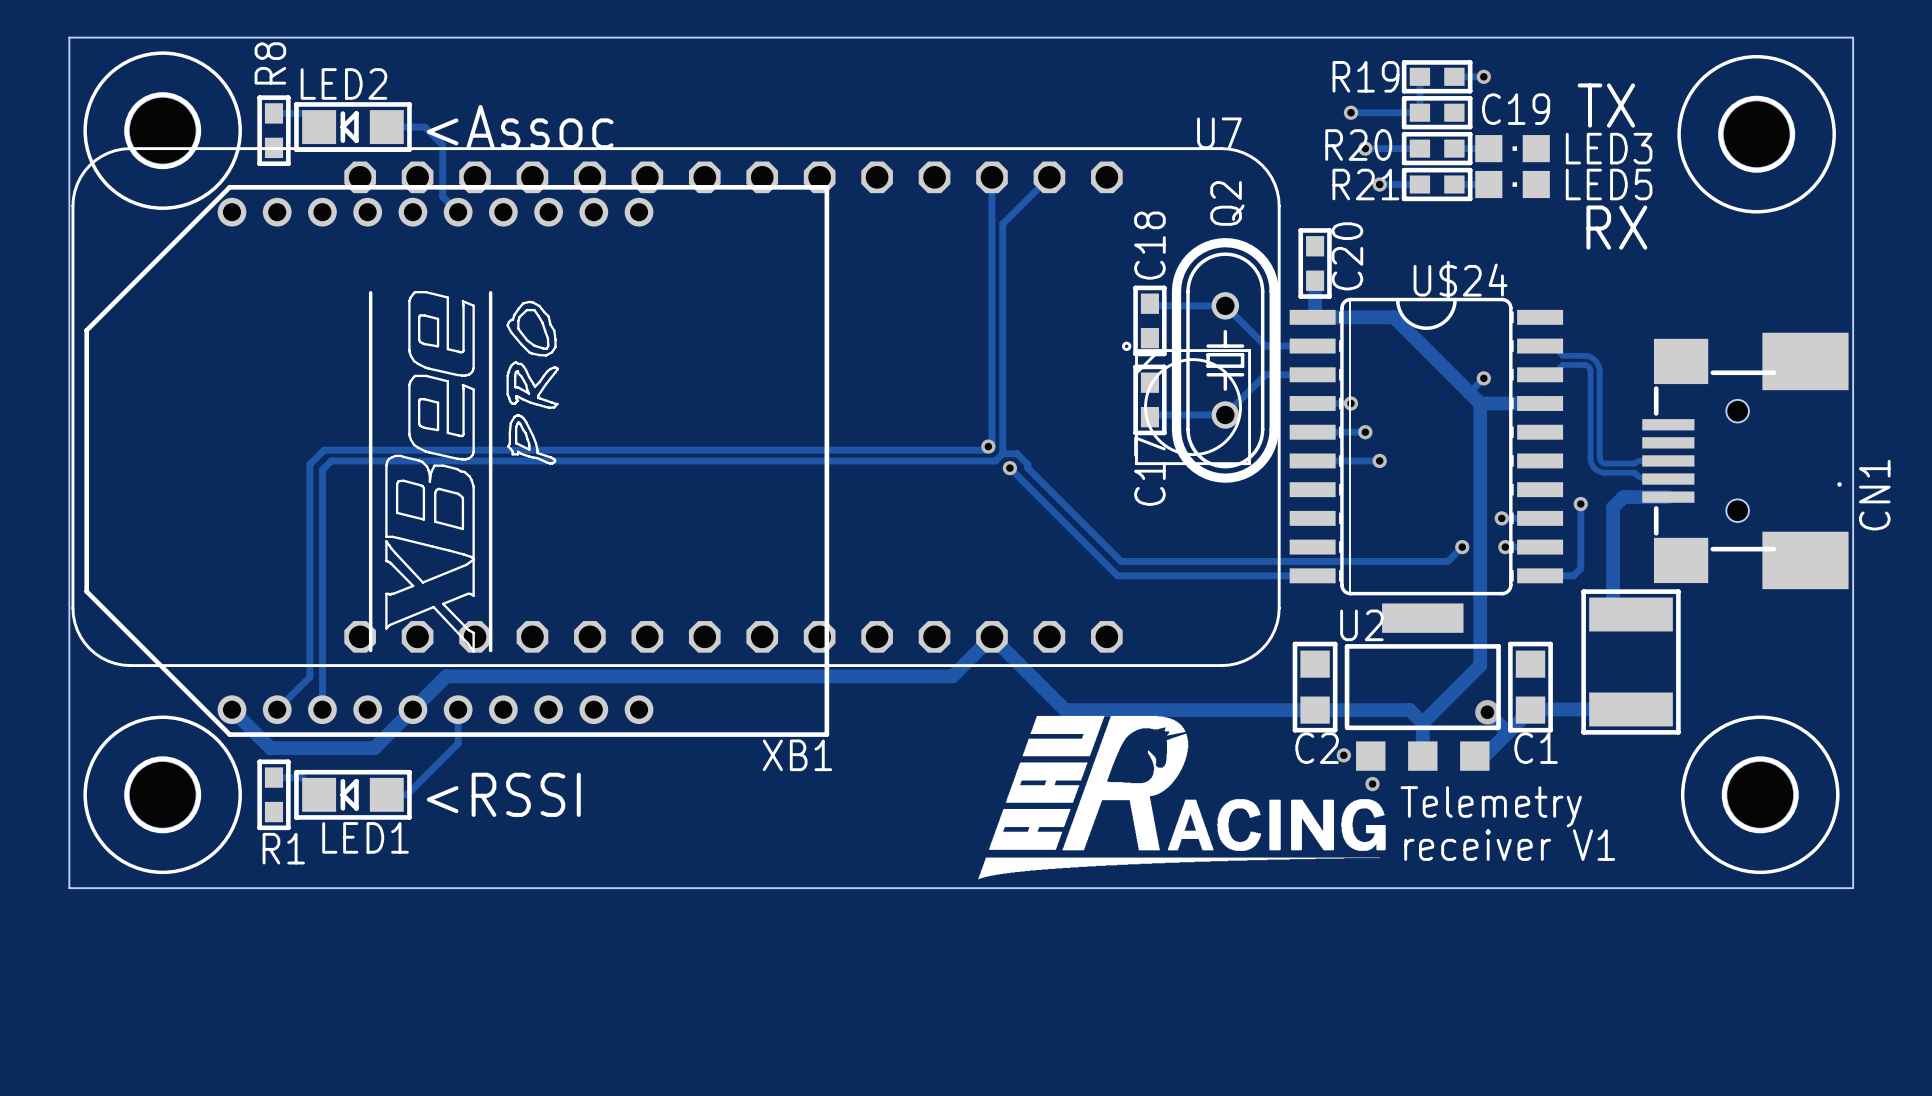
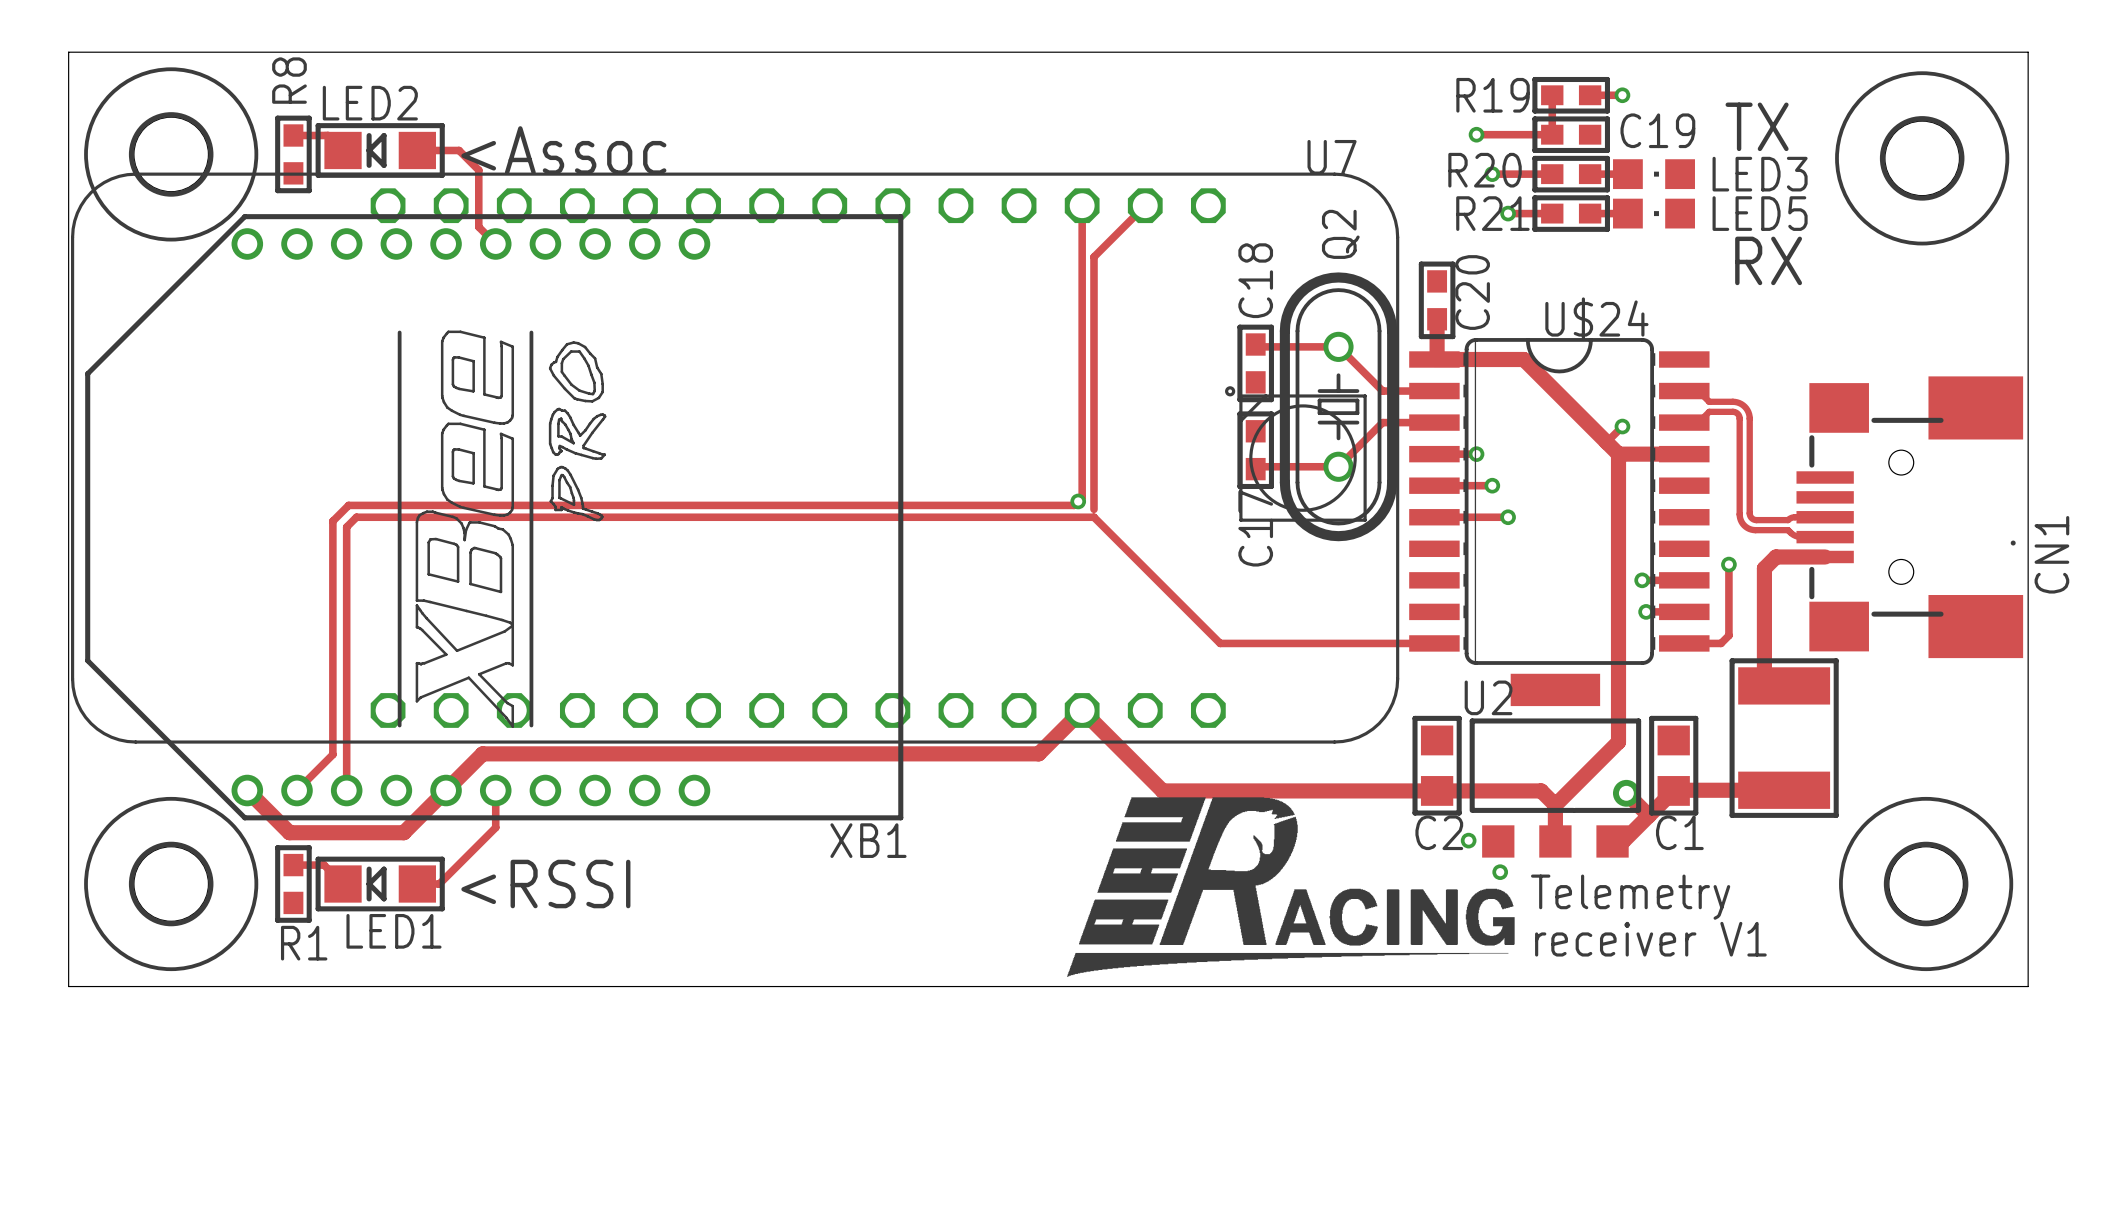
track: (995, 460) (1002, 453) (1017, 453) (1027, 464) (1027, 468) (1121, 561) (1447, 561) (1462, 547) -> (1086, 517) (1094, 517) (1101, 525)
via: (1009, 468) -> none
via: (1462, 547) -> none

